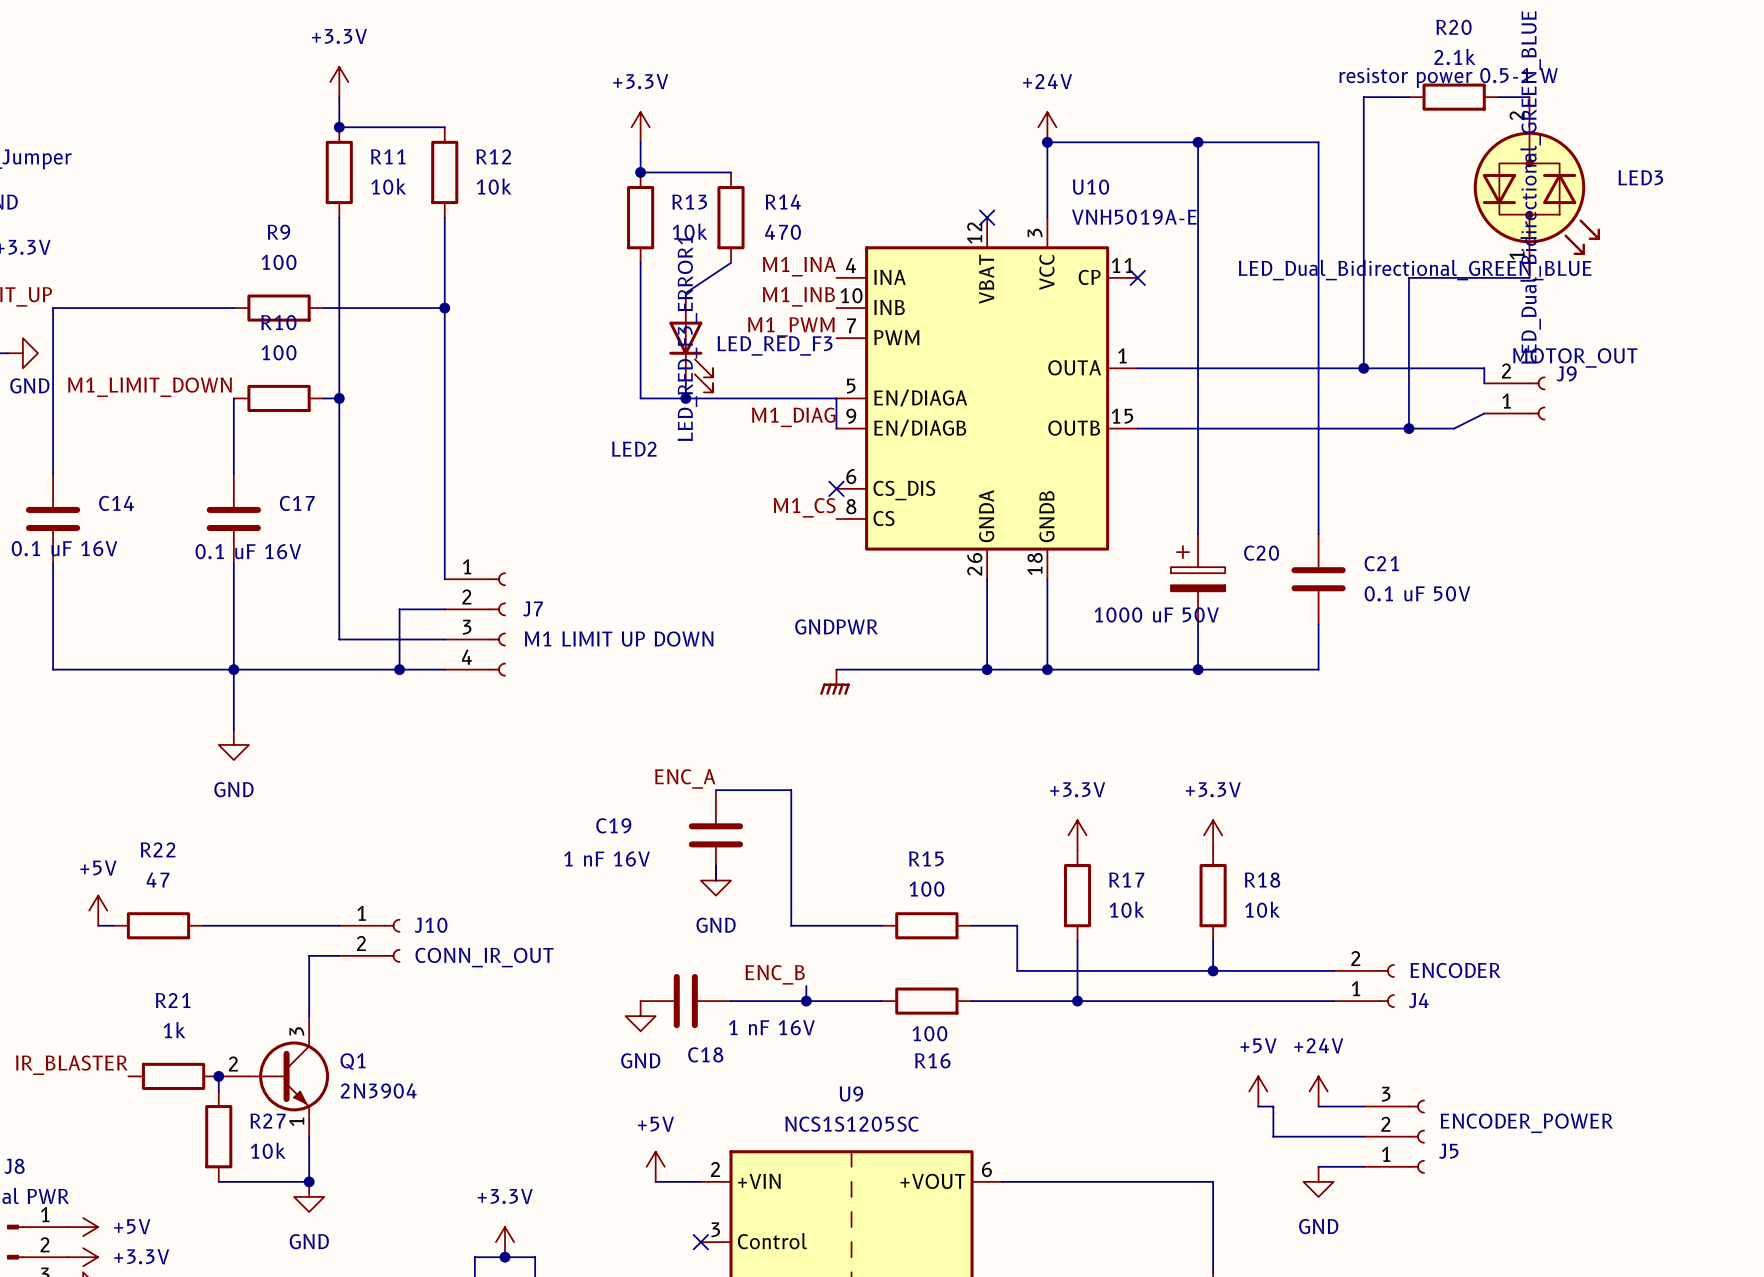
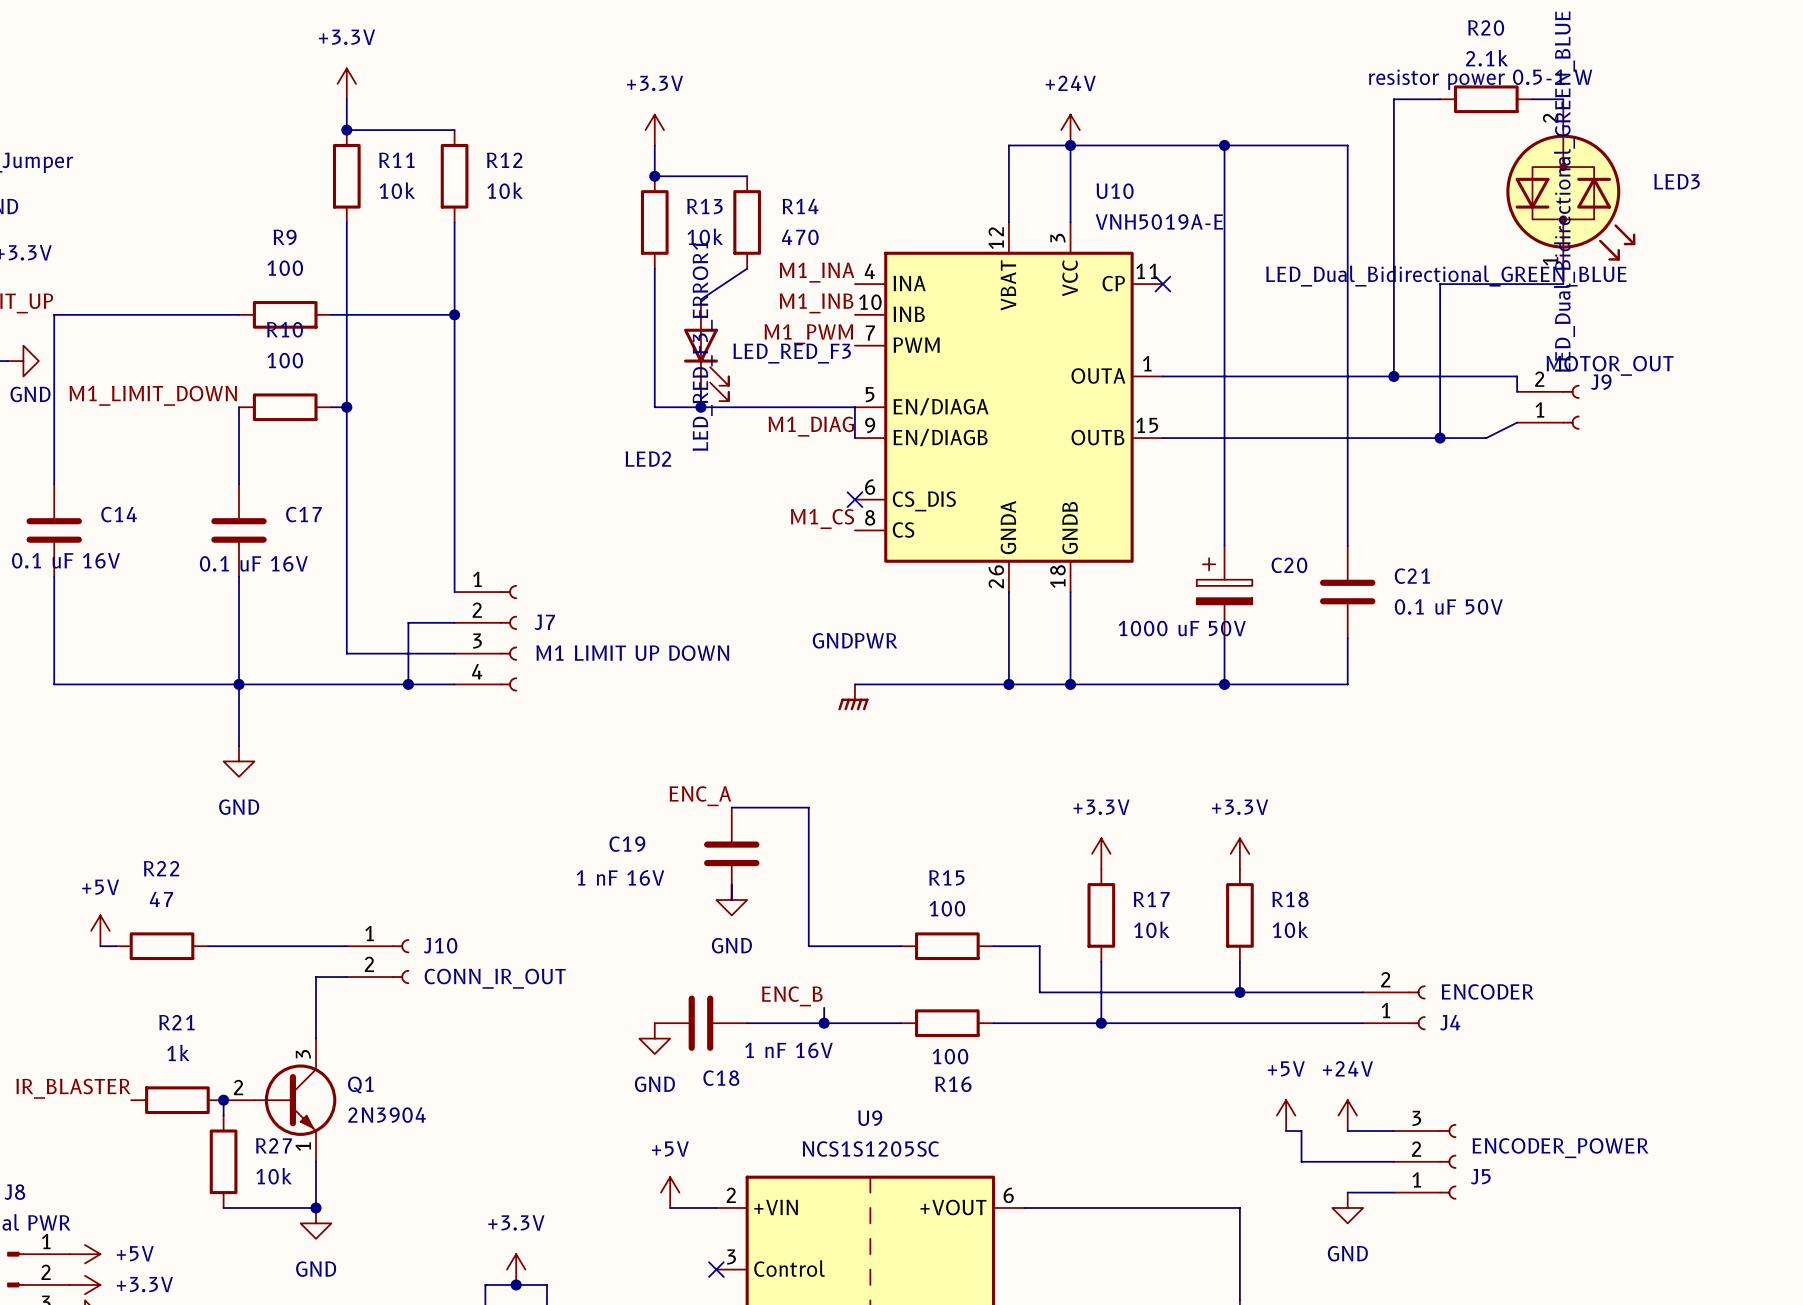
wire: none -> (1070, 145) (1008, 145) (1008, 222)
no-connect mark: (987, 217) -> none

